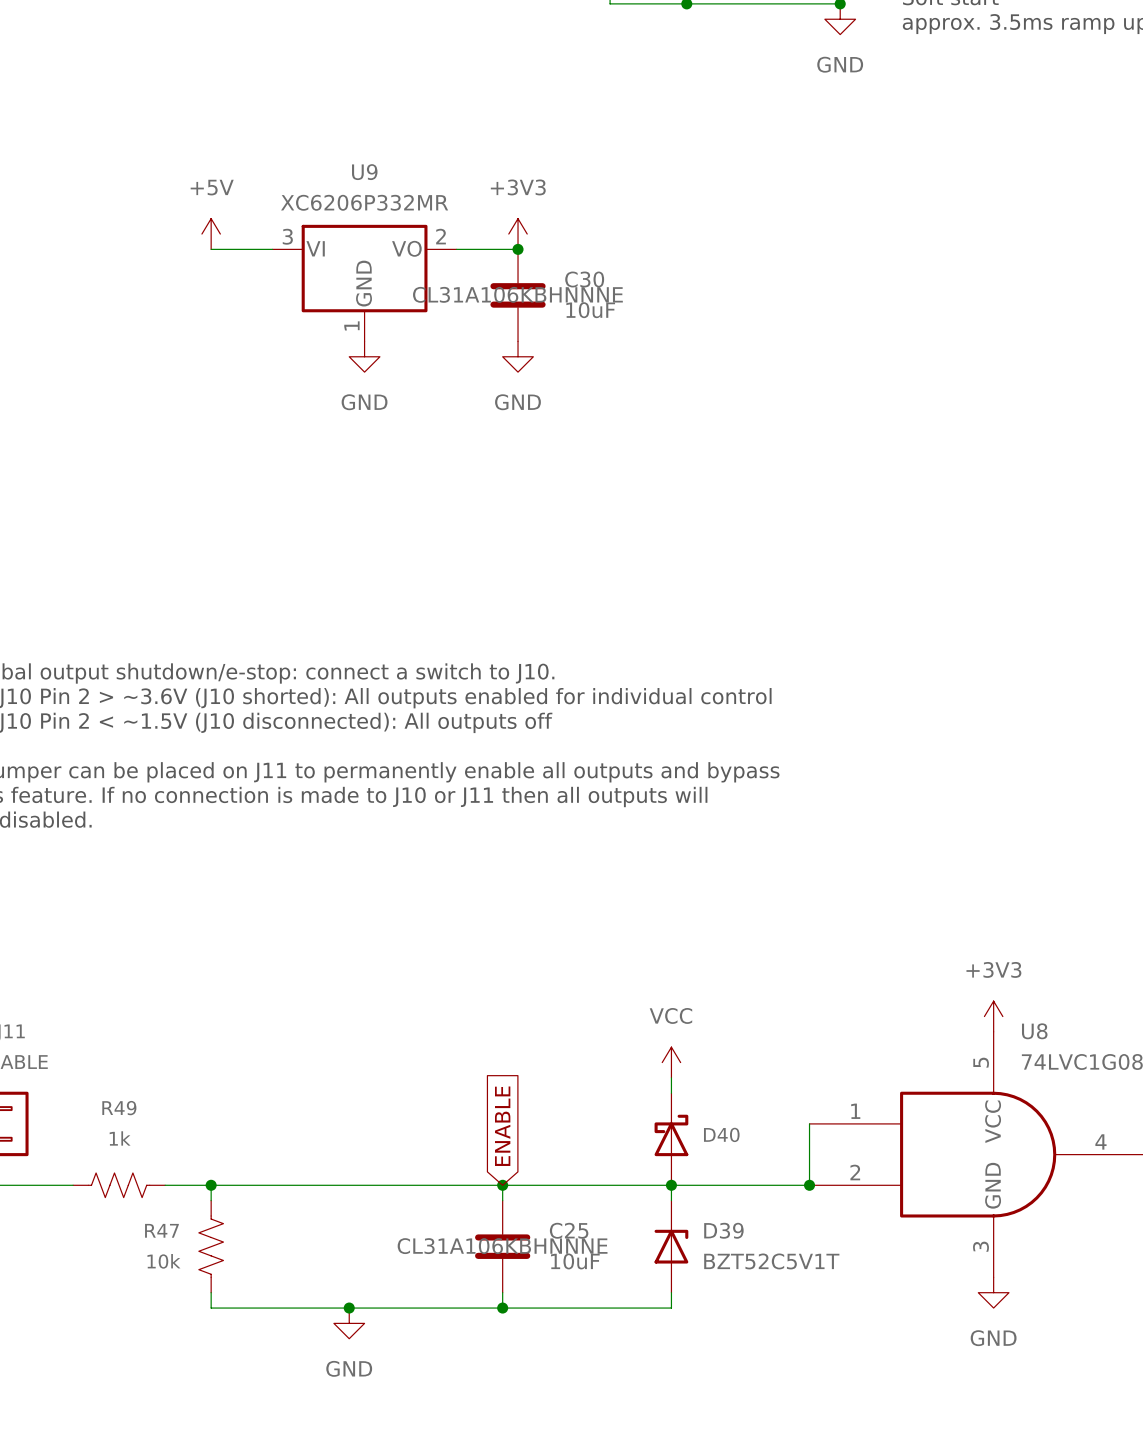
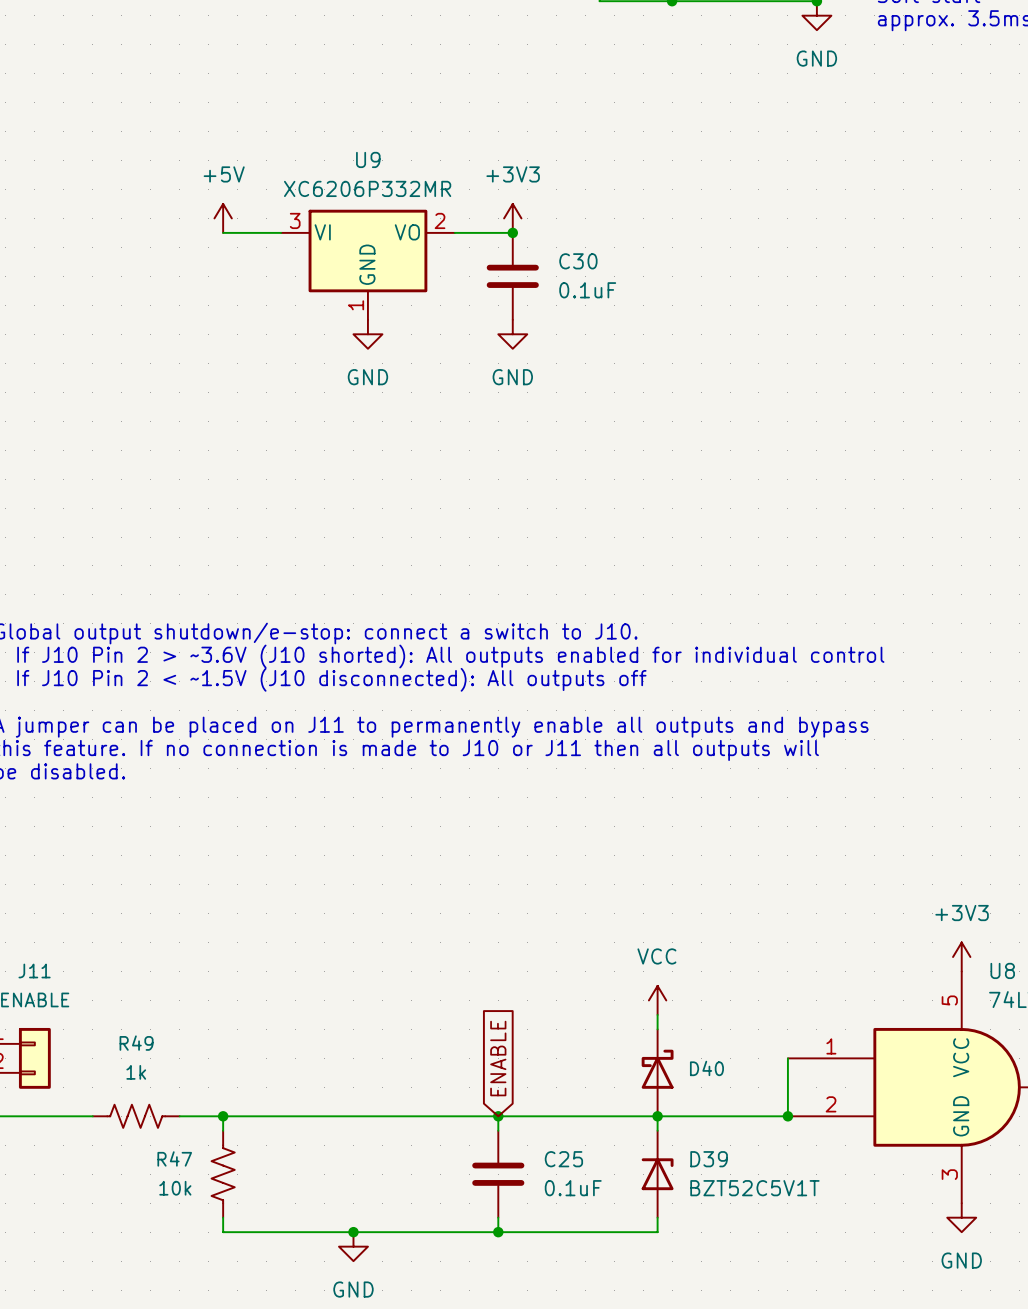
C30 text: CL31A106KBHNNNE (517, 294) -> none
C30 value: 10uF (590, 310) -> 0.1uF (587, 290)
C25 text: CL31A106KBHNNNE (502, 1246) -> none
C25 value: 10uF (575, 1261) -> 0.1uF (573, 1188)

